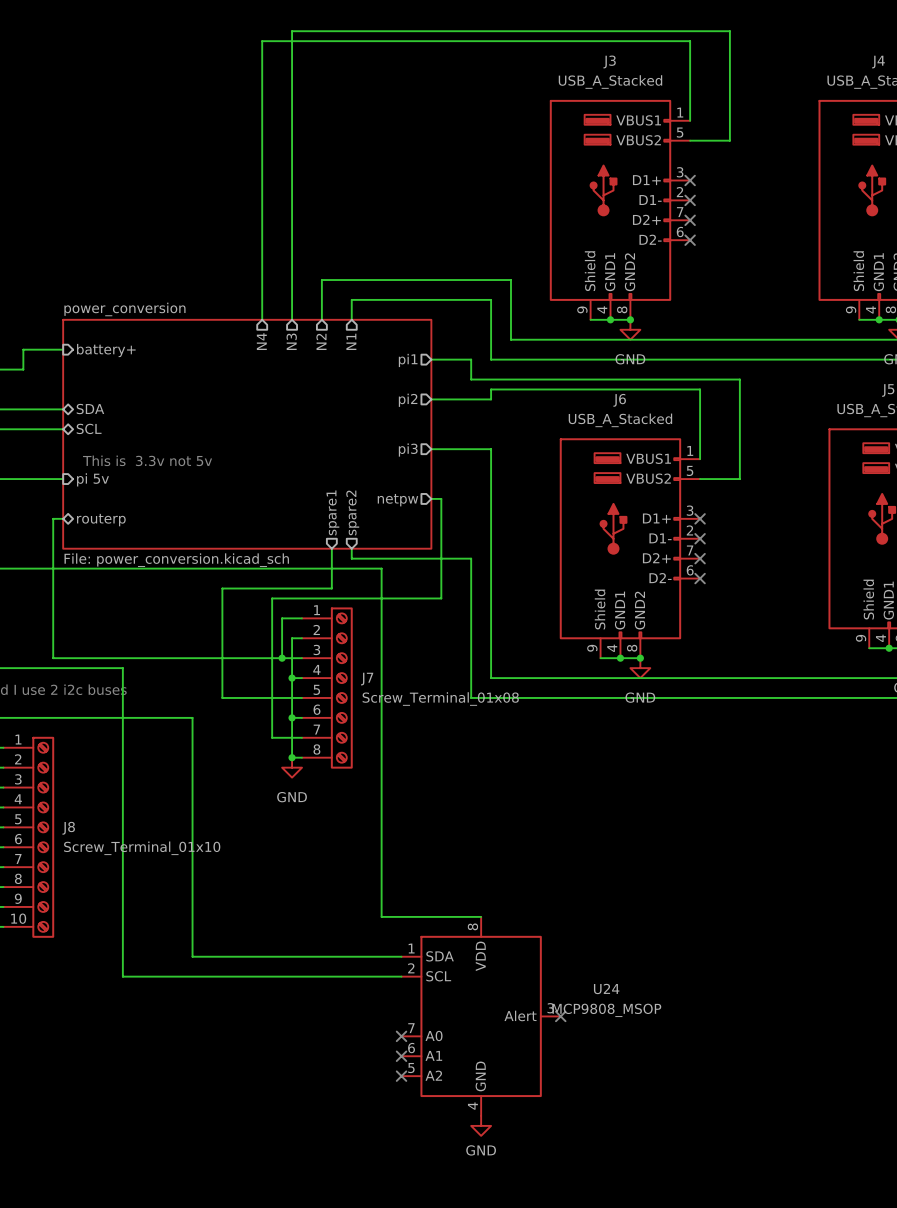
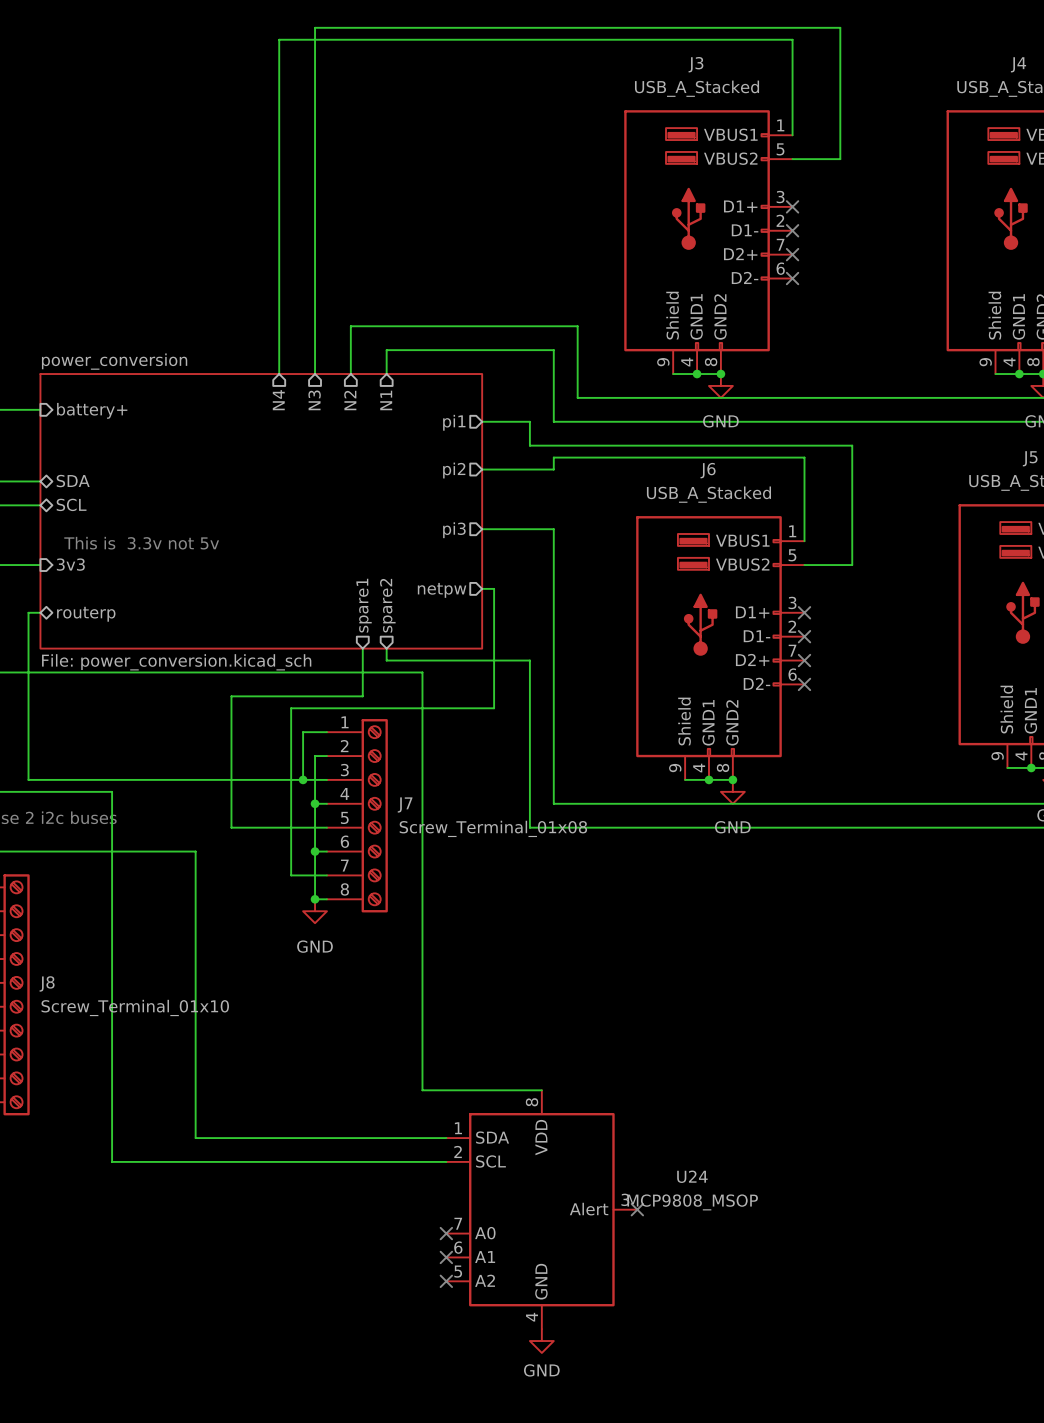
sheet pin: pi 5v (92, 479) -> 3v3 (70, 564)

